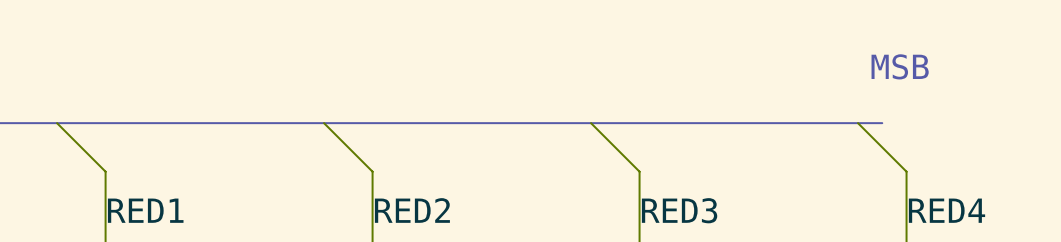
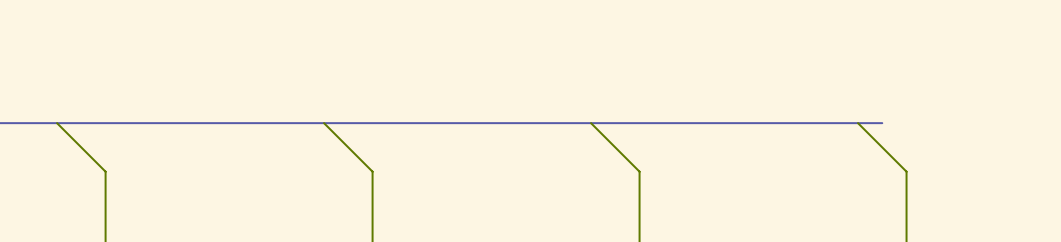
text: MSB (900, 66) -> none
label: RED1 (145, 210) -> none
label: RED2 (412, 210) -> none
label: RED3 (679, 210) -> none
label: RED4 (946, 210) -> none

